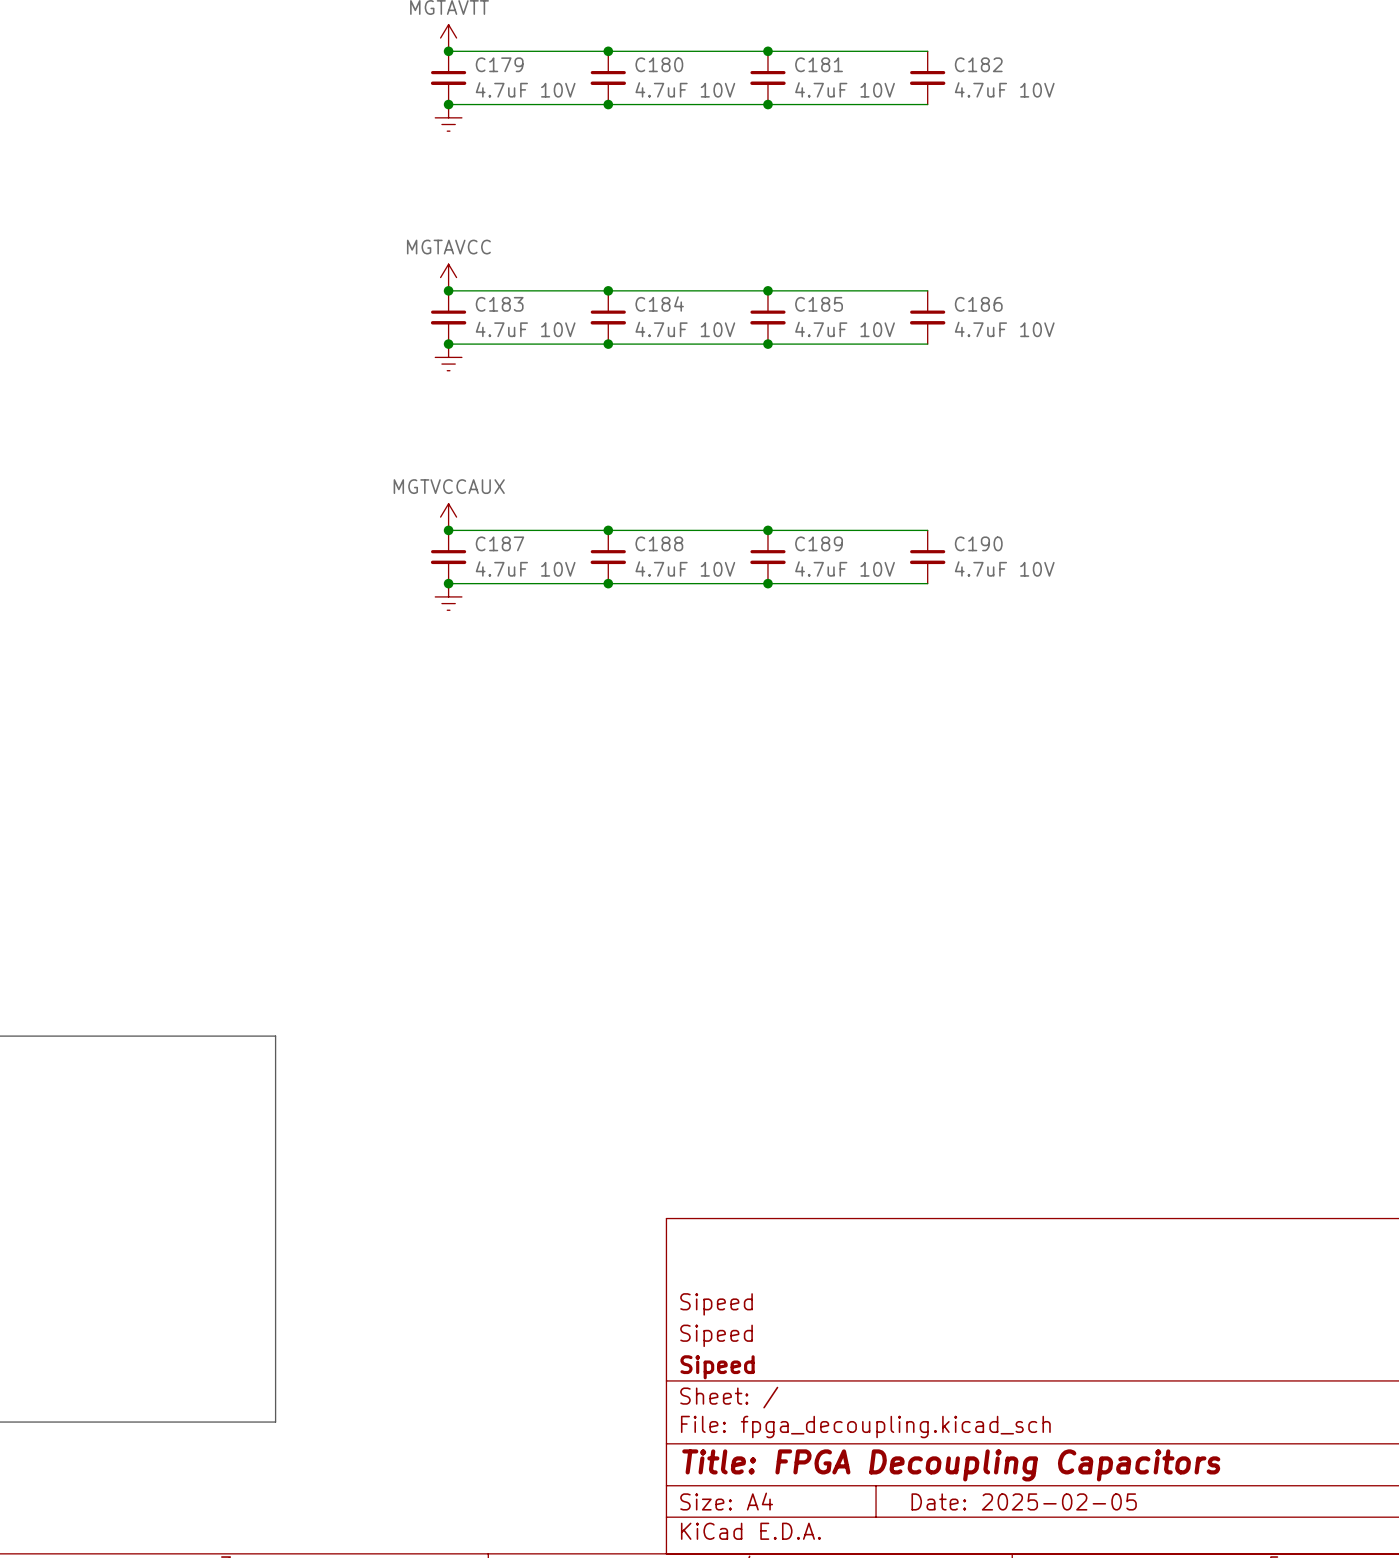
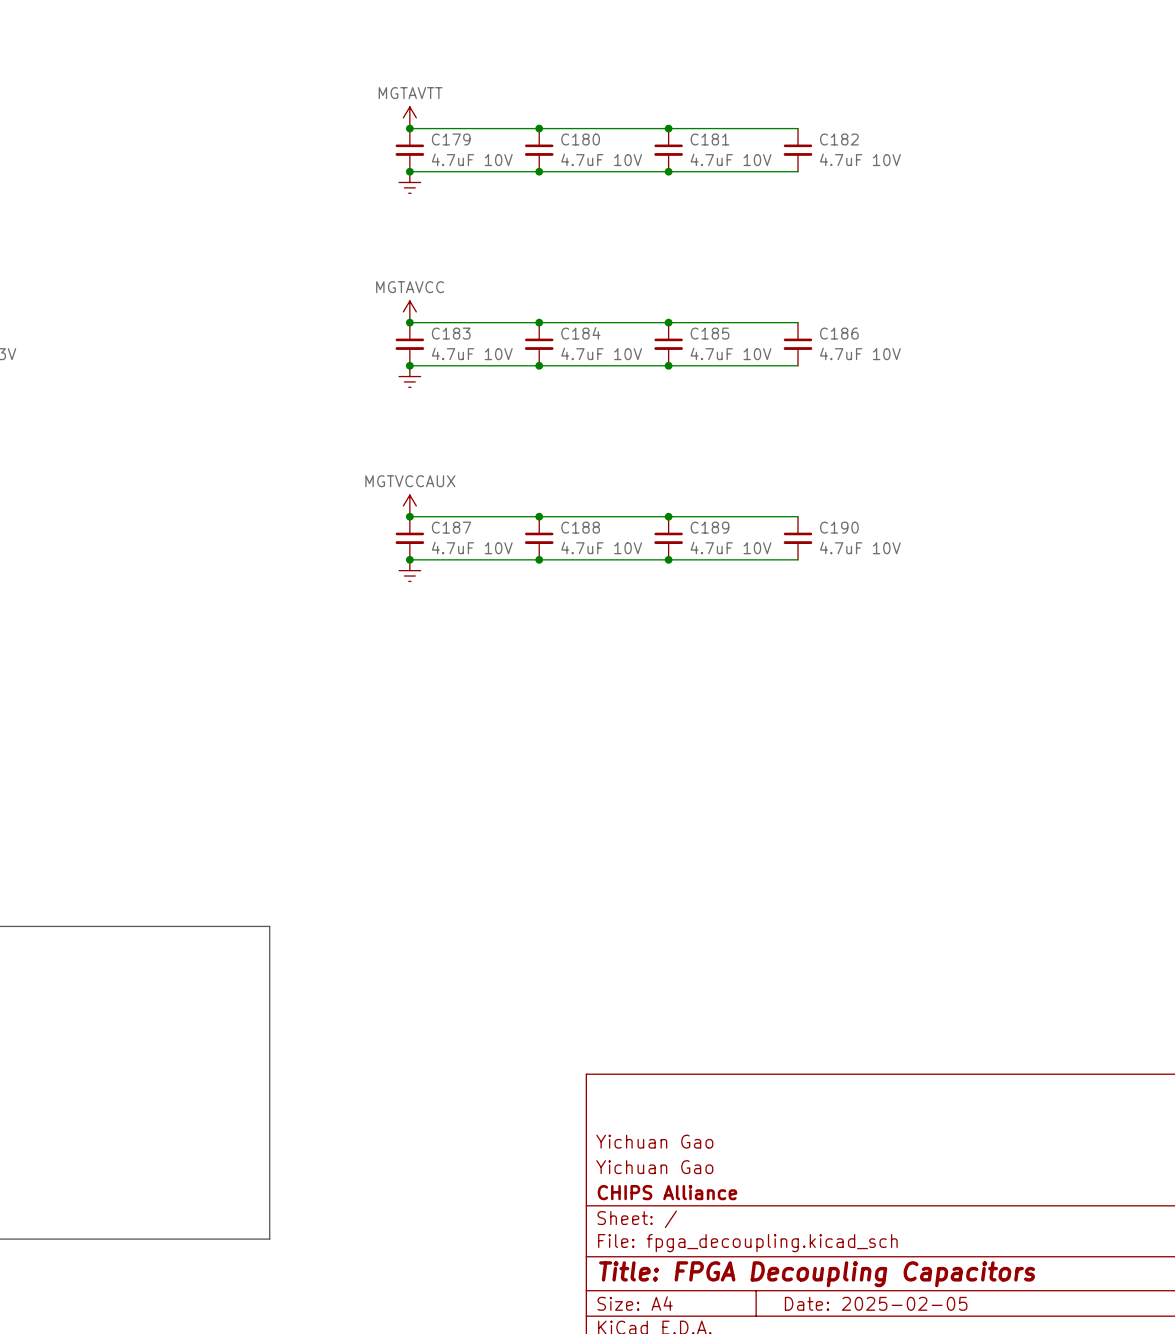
title block: Sipeed (716, 1304) -> Yichuan Gao (654, 1141)
title block: Sipeed (716, 1335) -> Yichuan Gao (654, 1167)
title block: Sipeed (717, 1367) -> CHIPS Alliance (667, 1192)

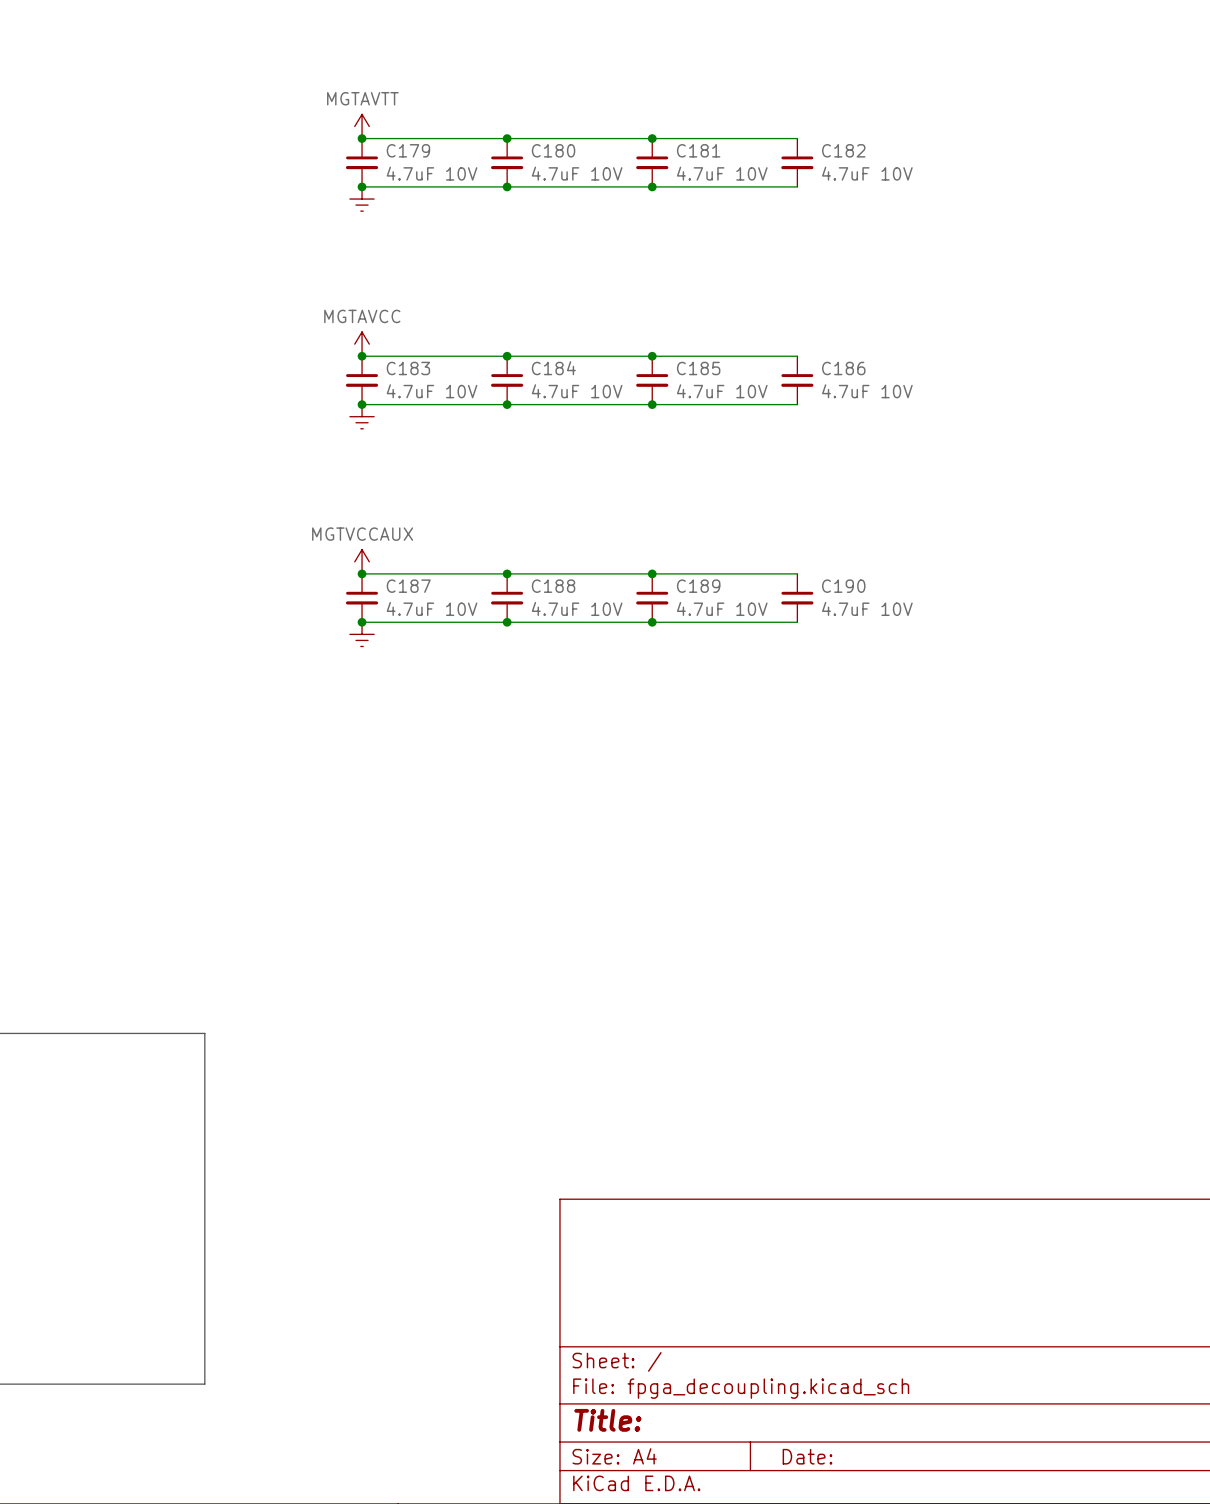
title block: Yichuan Gao (654, 1141) -> none
title block: Yichuan Gao (654, 1167) -> none
title block: CHIPS Alliance (667, 1192) -> none
title block: Title: FPGA Decoupling Capacitors (817, 1274) -> Title: (607, 1420)
title block: Date: 2025-02-05 (876, 1303) -> Date: (807, 1456)

